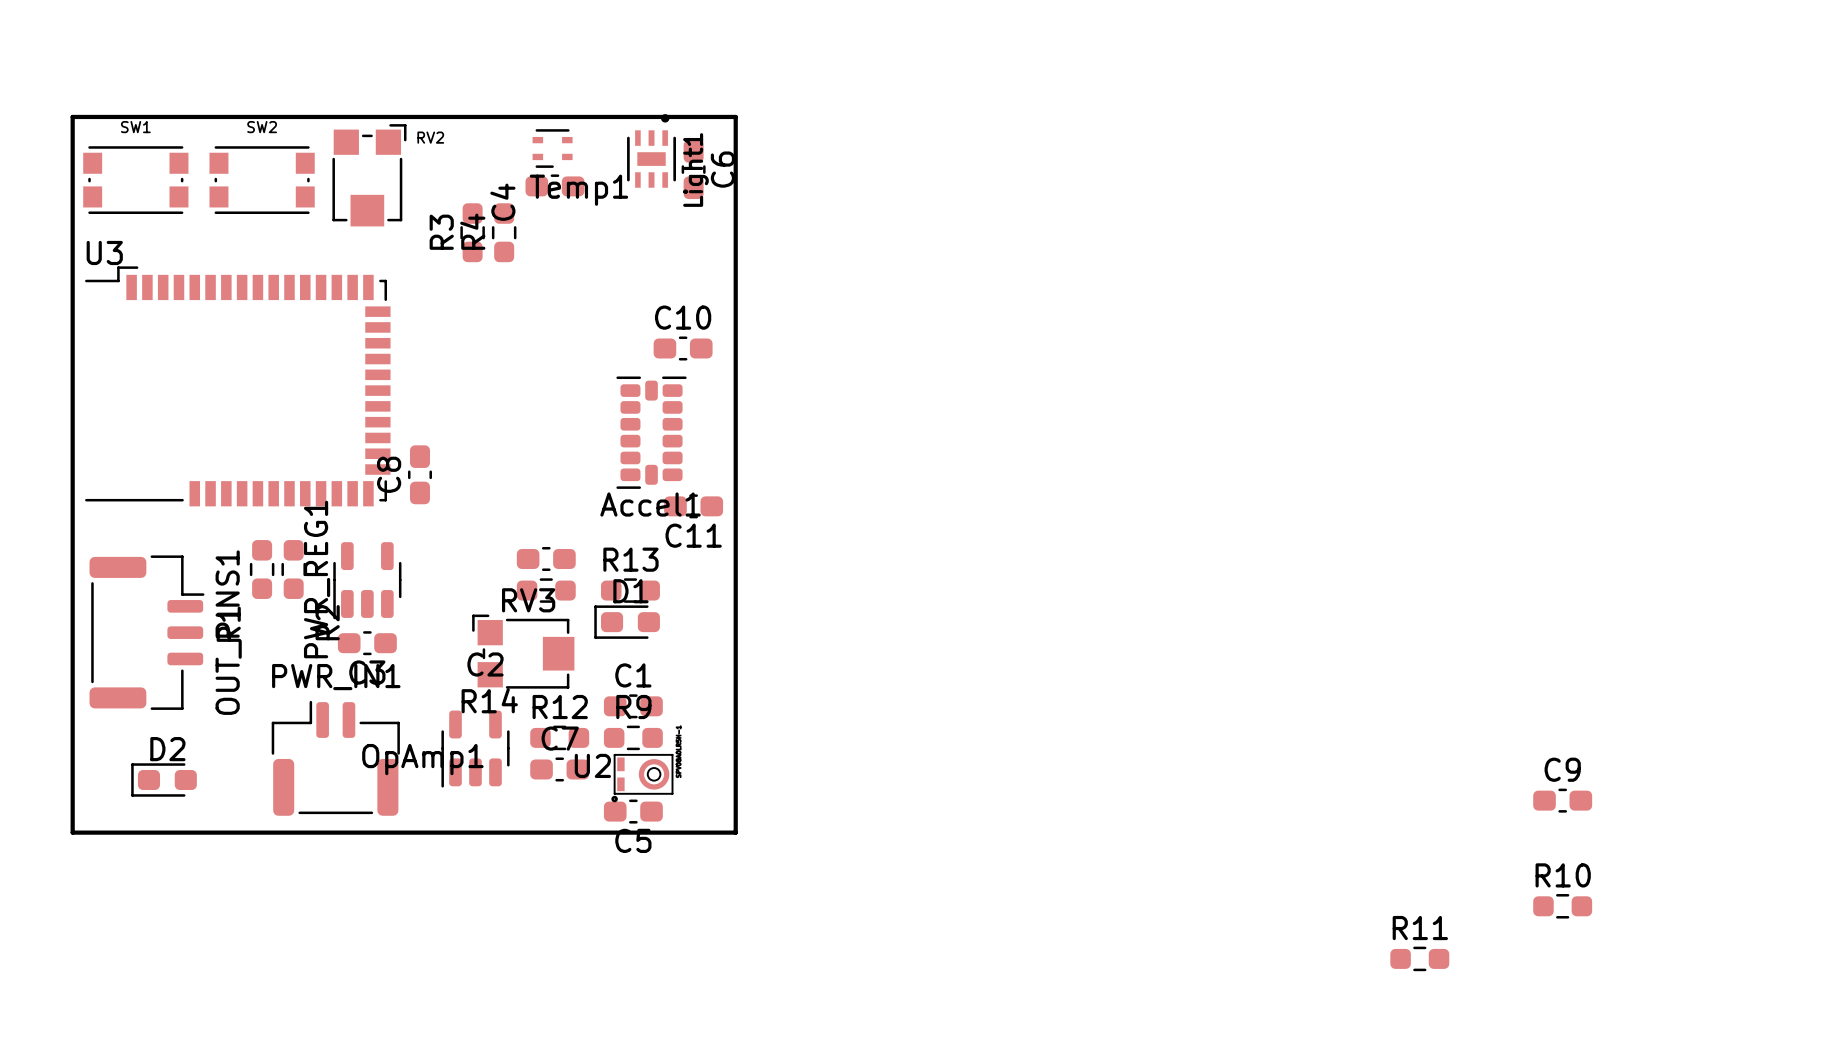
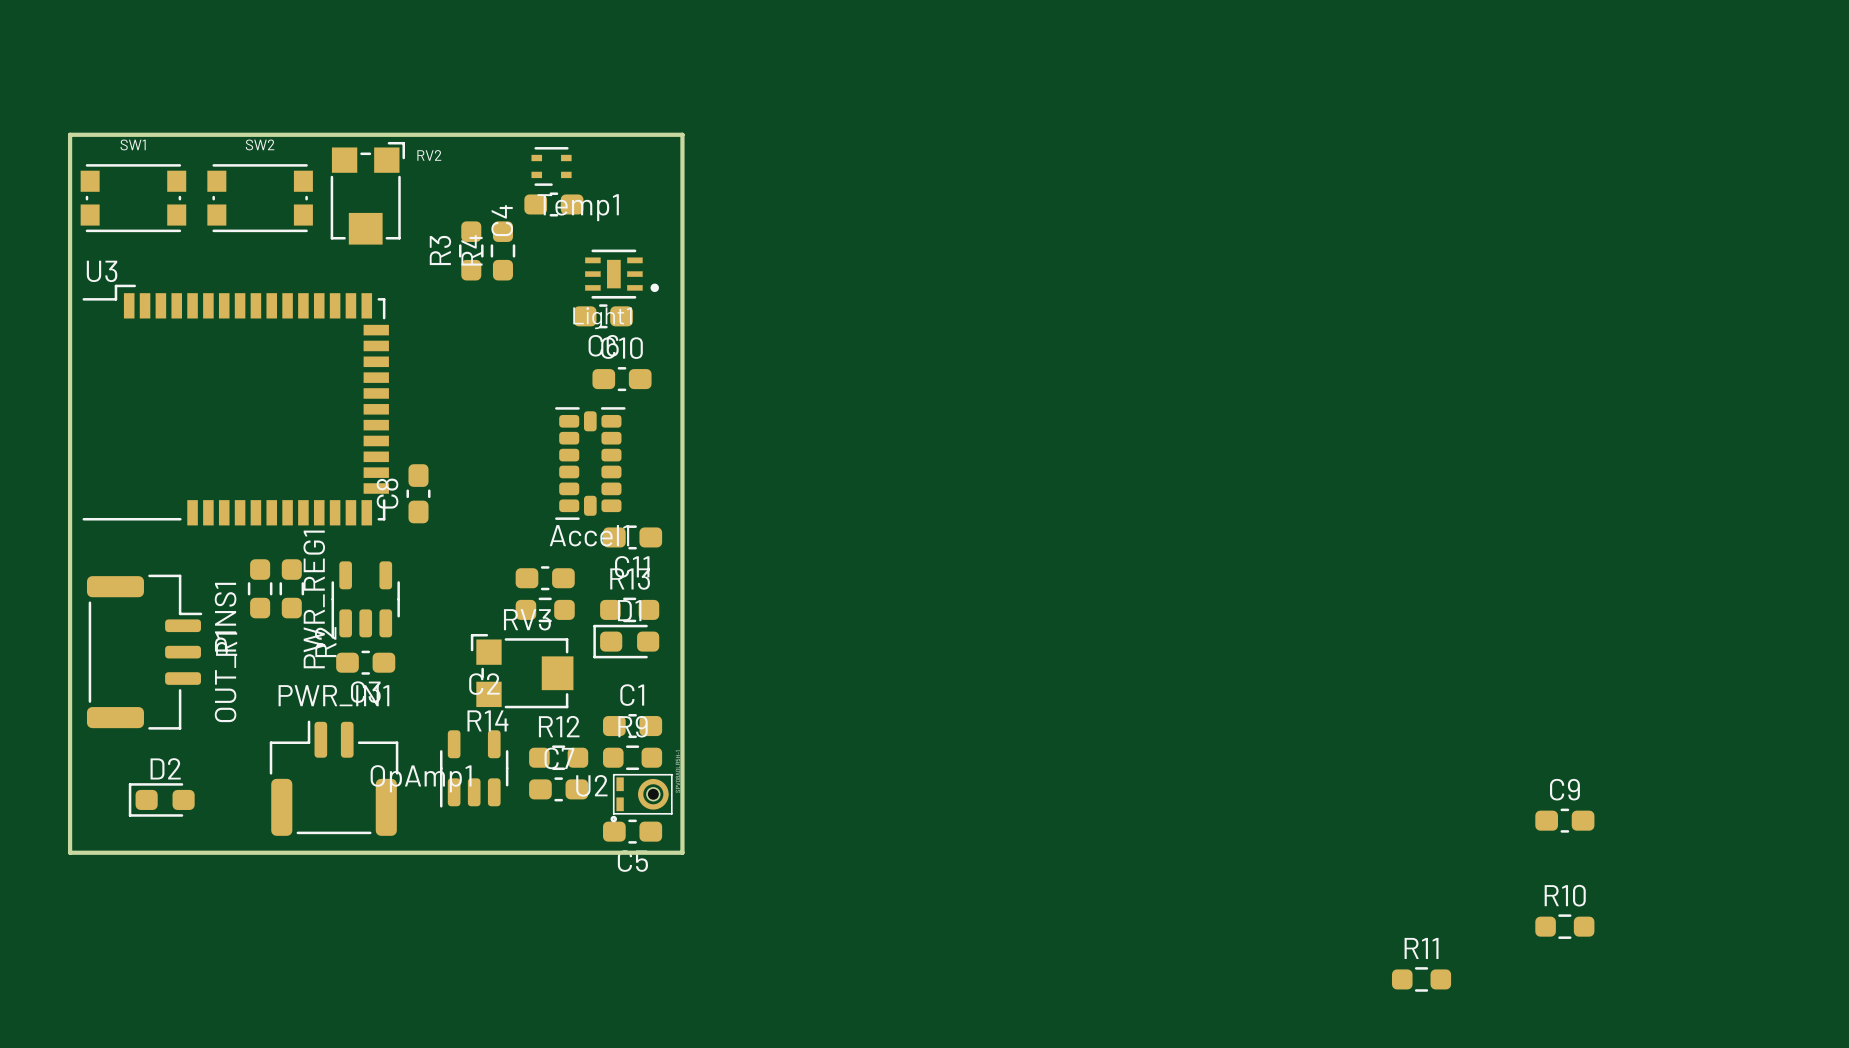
board edge: (683, 116) (735, 116) (735, 832) (683, 832) -> (682, 134) (682, 852)
Light1 rotation: 0° (651, 150) -> 90° clockwise (622, 274)
Light1 position: (651, 150) -> (622, 274)
C6 rotation: 0° (693, 169) -> 90° clockwise (603, 316)
C6 position: (693, 169) -> (603, 316)
C10 position: (683, 348) -> (622, 379)
Accel1 position: (651, 432) -> (590, 463)
C11 position: (693, 506) -> (632, 537)

